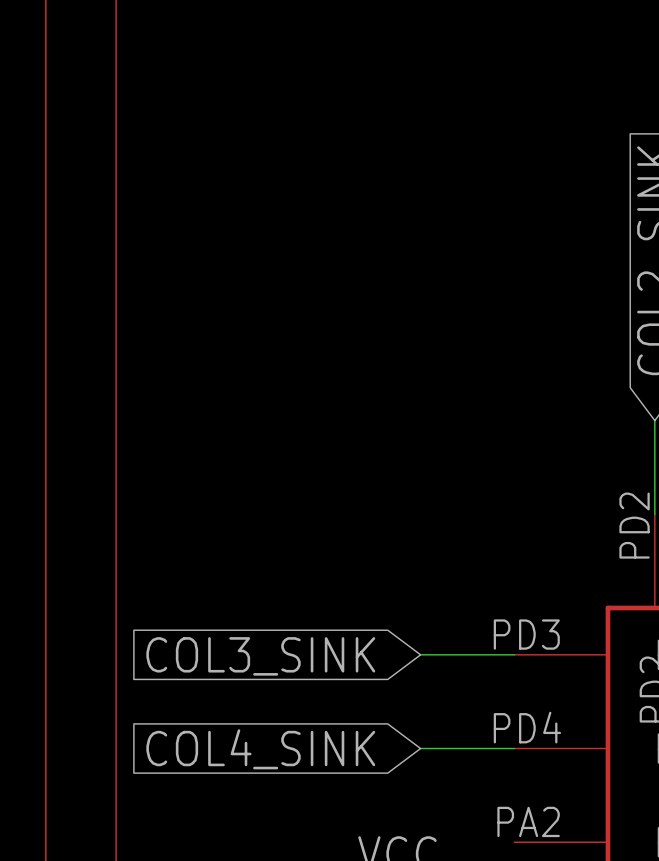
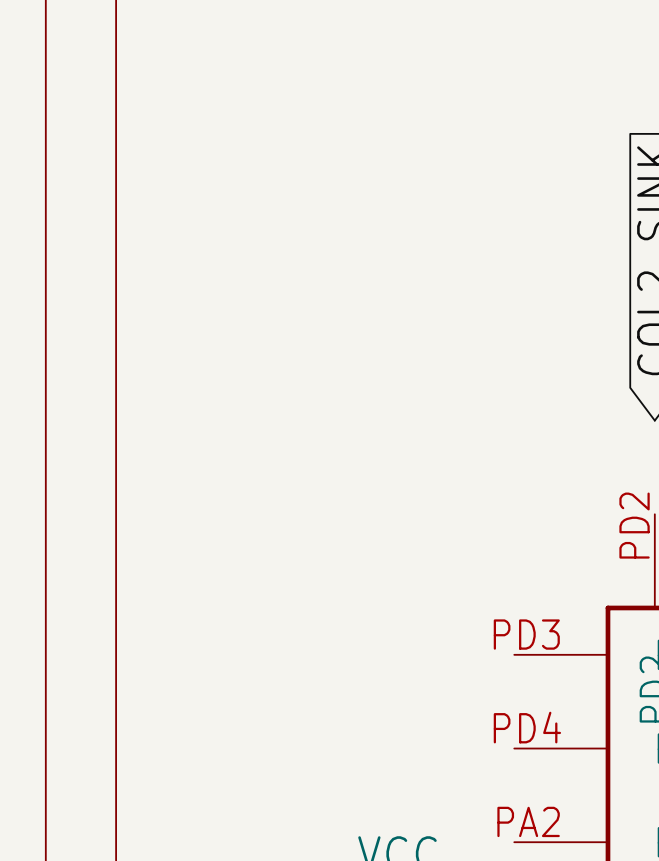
wire: (654, 420) (654, 514) -> none
wire: (420, 654) (514, 654) -> none
global label: COL3_SINK (260, 656) -> none
wire: (420, 748) (514, 748) -> none
global label: COL4_SINK (260, 749) -> none

